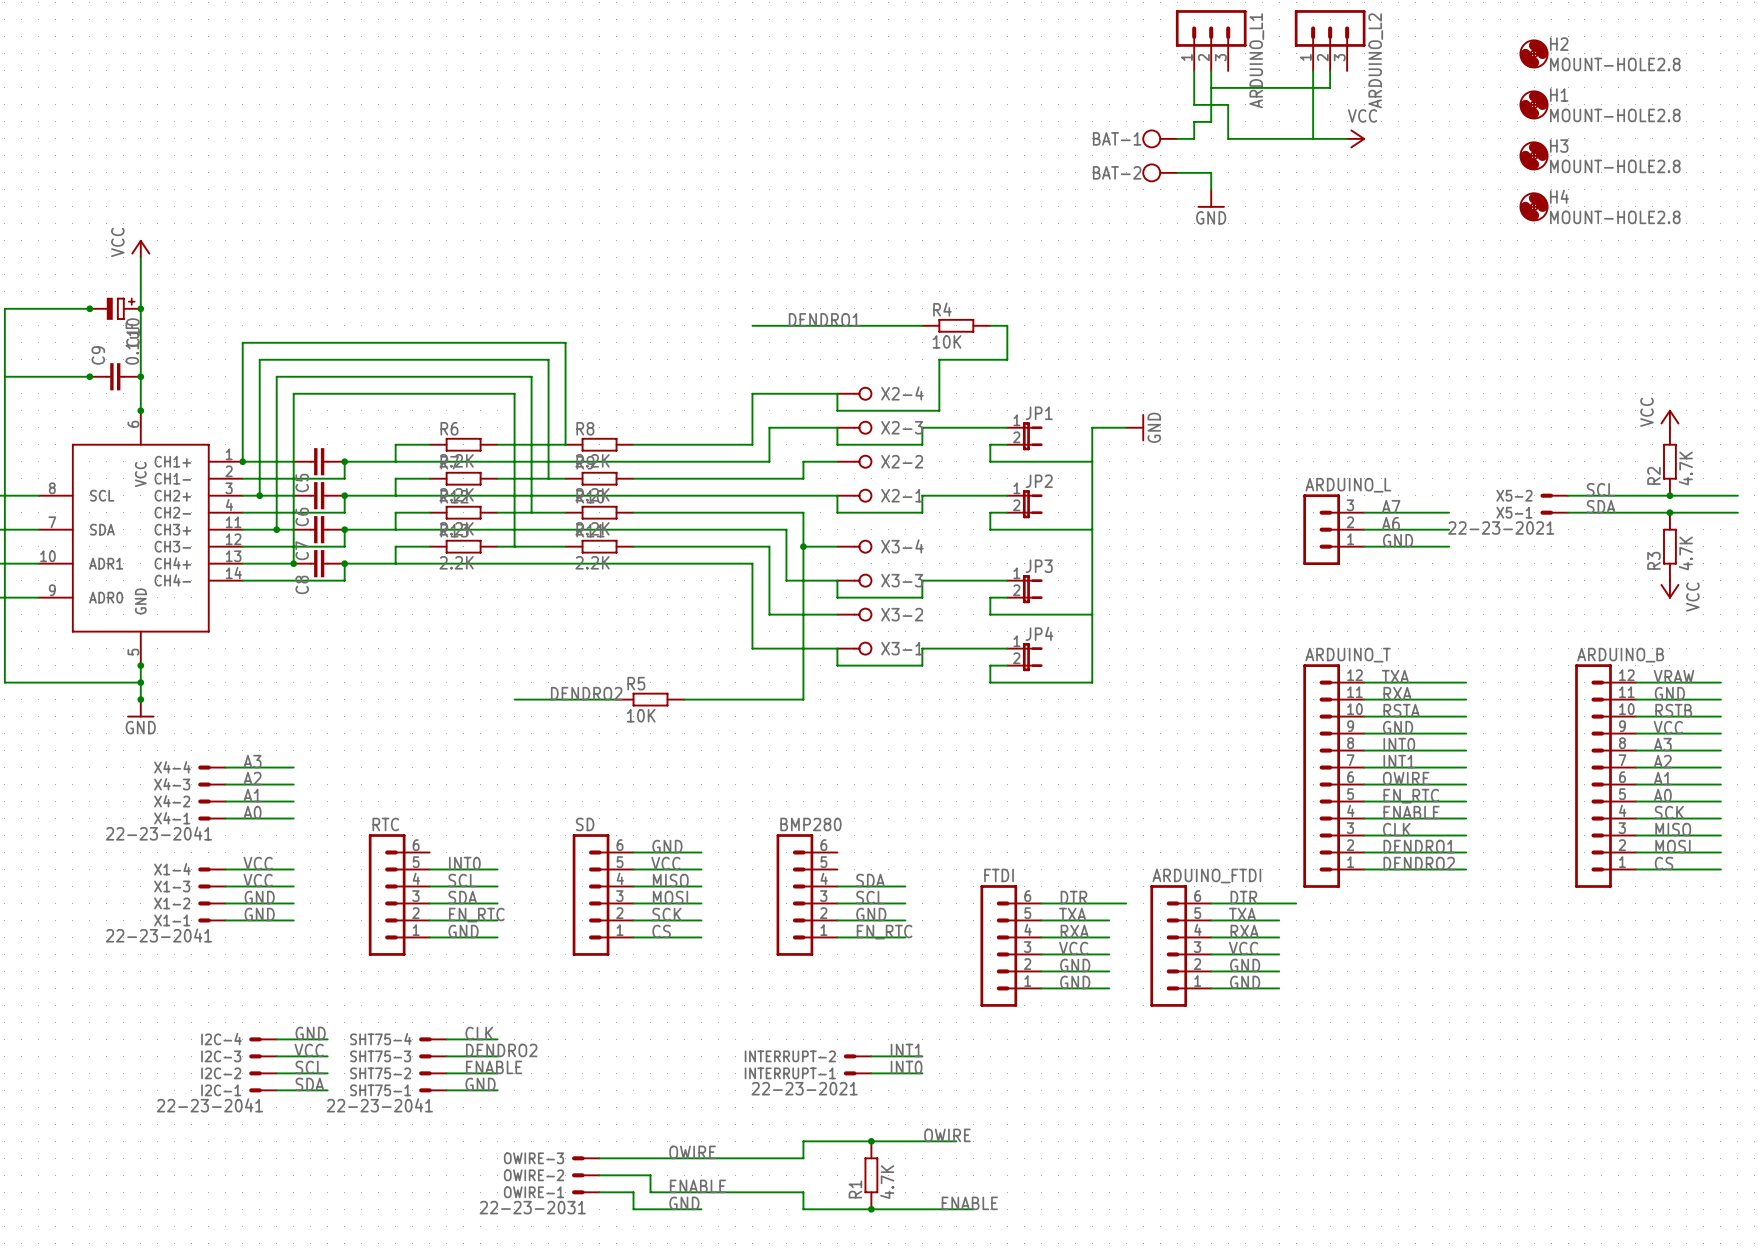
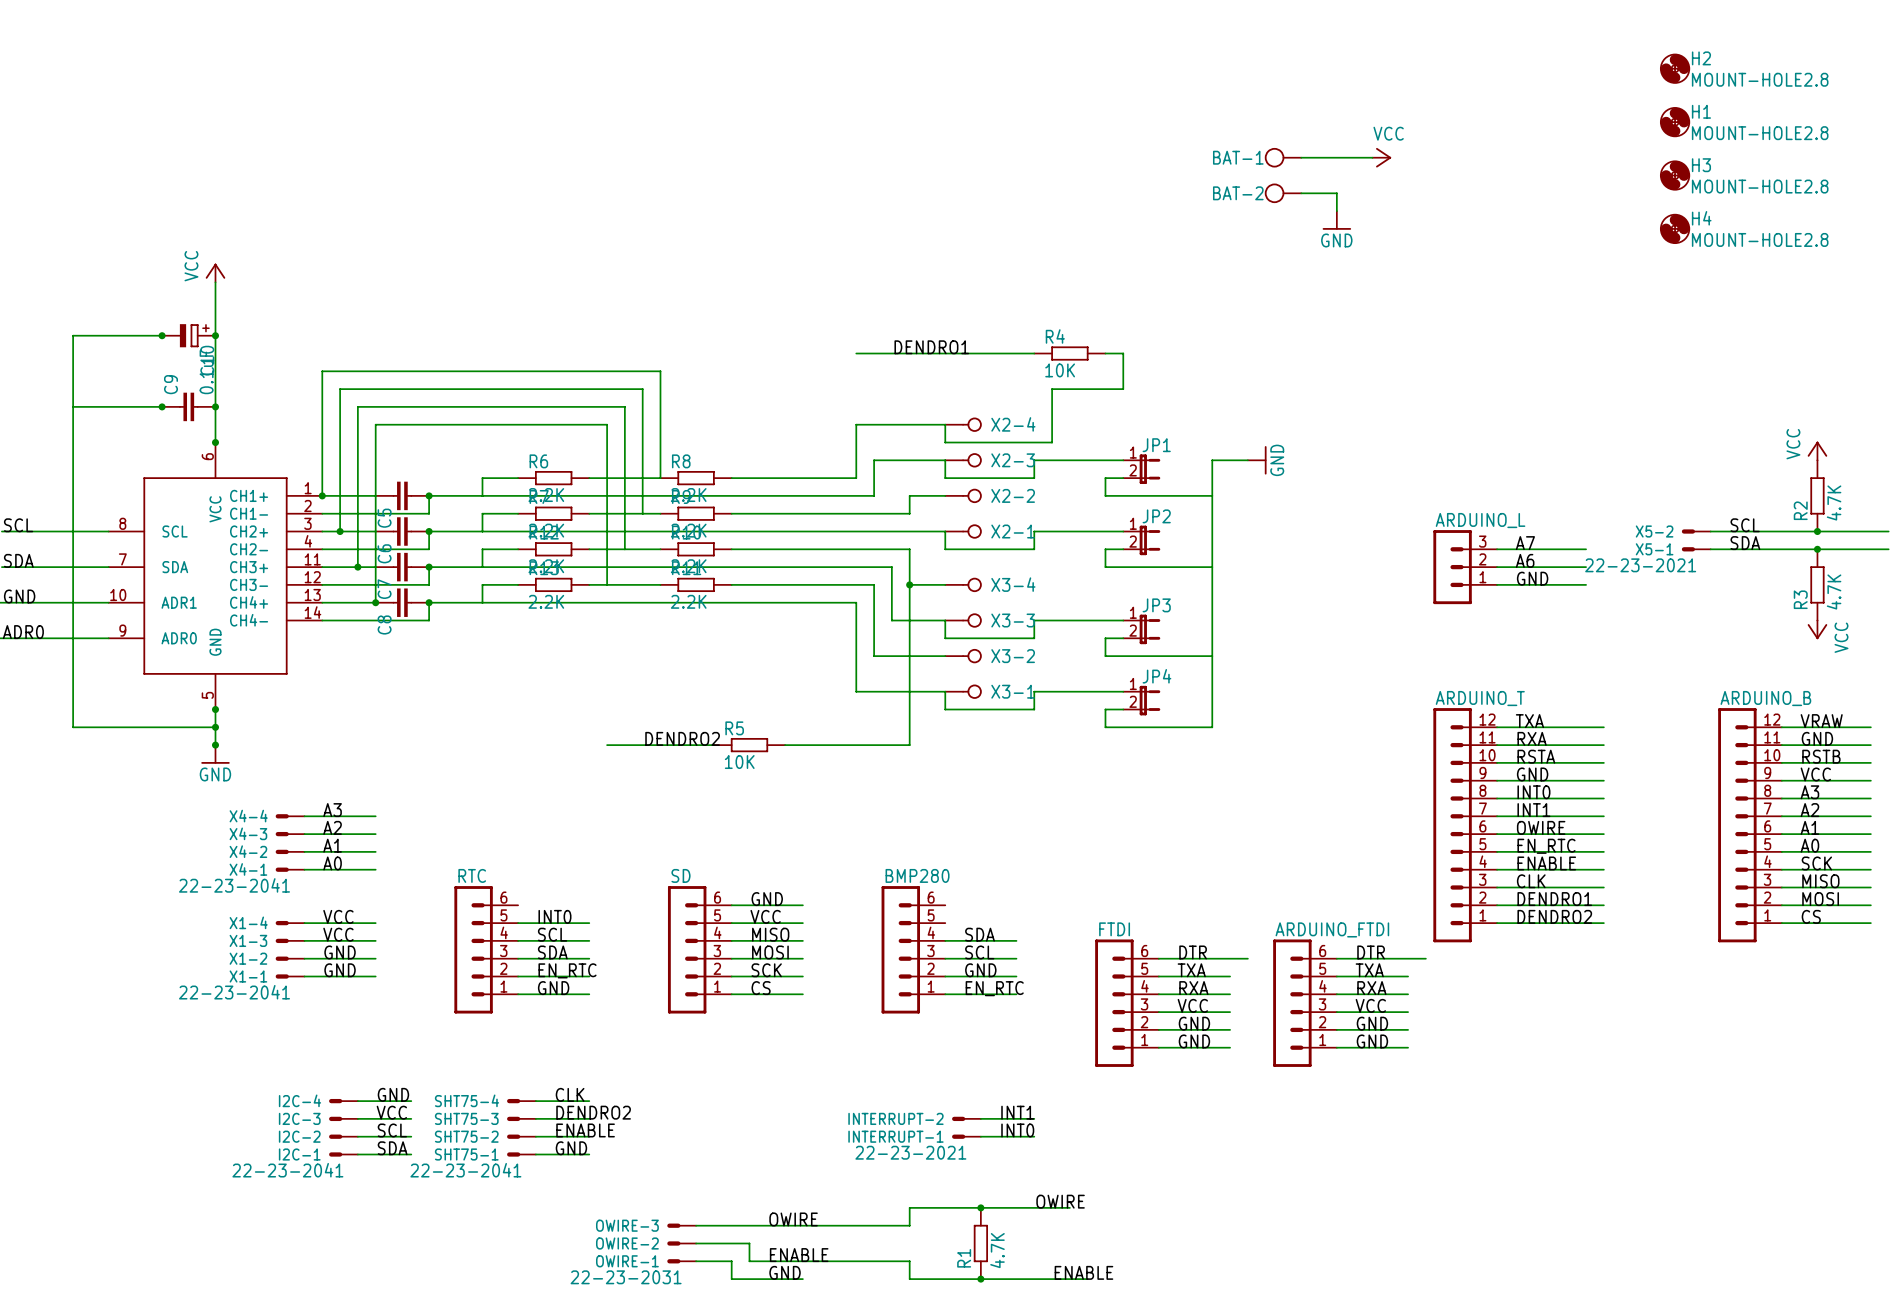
ARDUINO_L1: (1211, 40) -> none
ARDUINO_L2: (1330, 40) -> none
wire: (1194, 70) (1194, 104) (1228, 104) (1228, 138) -> (1319, 157) (1354, 157)
wire: (1211, 70) (1211, 121) (1194, 121) (1194, 138) -> none
wire: (1313, 70) (1313, 138) -> none
wire: (1330, 70) (1330, 87) (1211, 87) -> none
wire: (1245, 138) (1347, 138) -> none
power symbol position: VCC (1356, 138) -> VCC (1381, 157)

